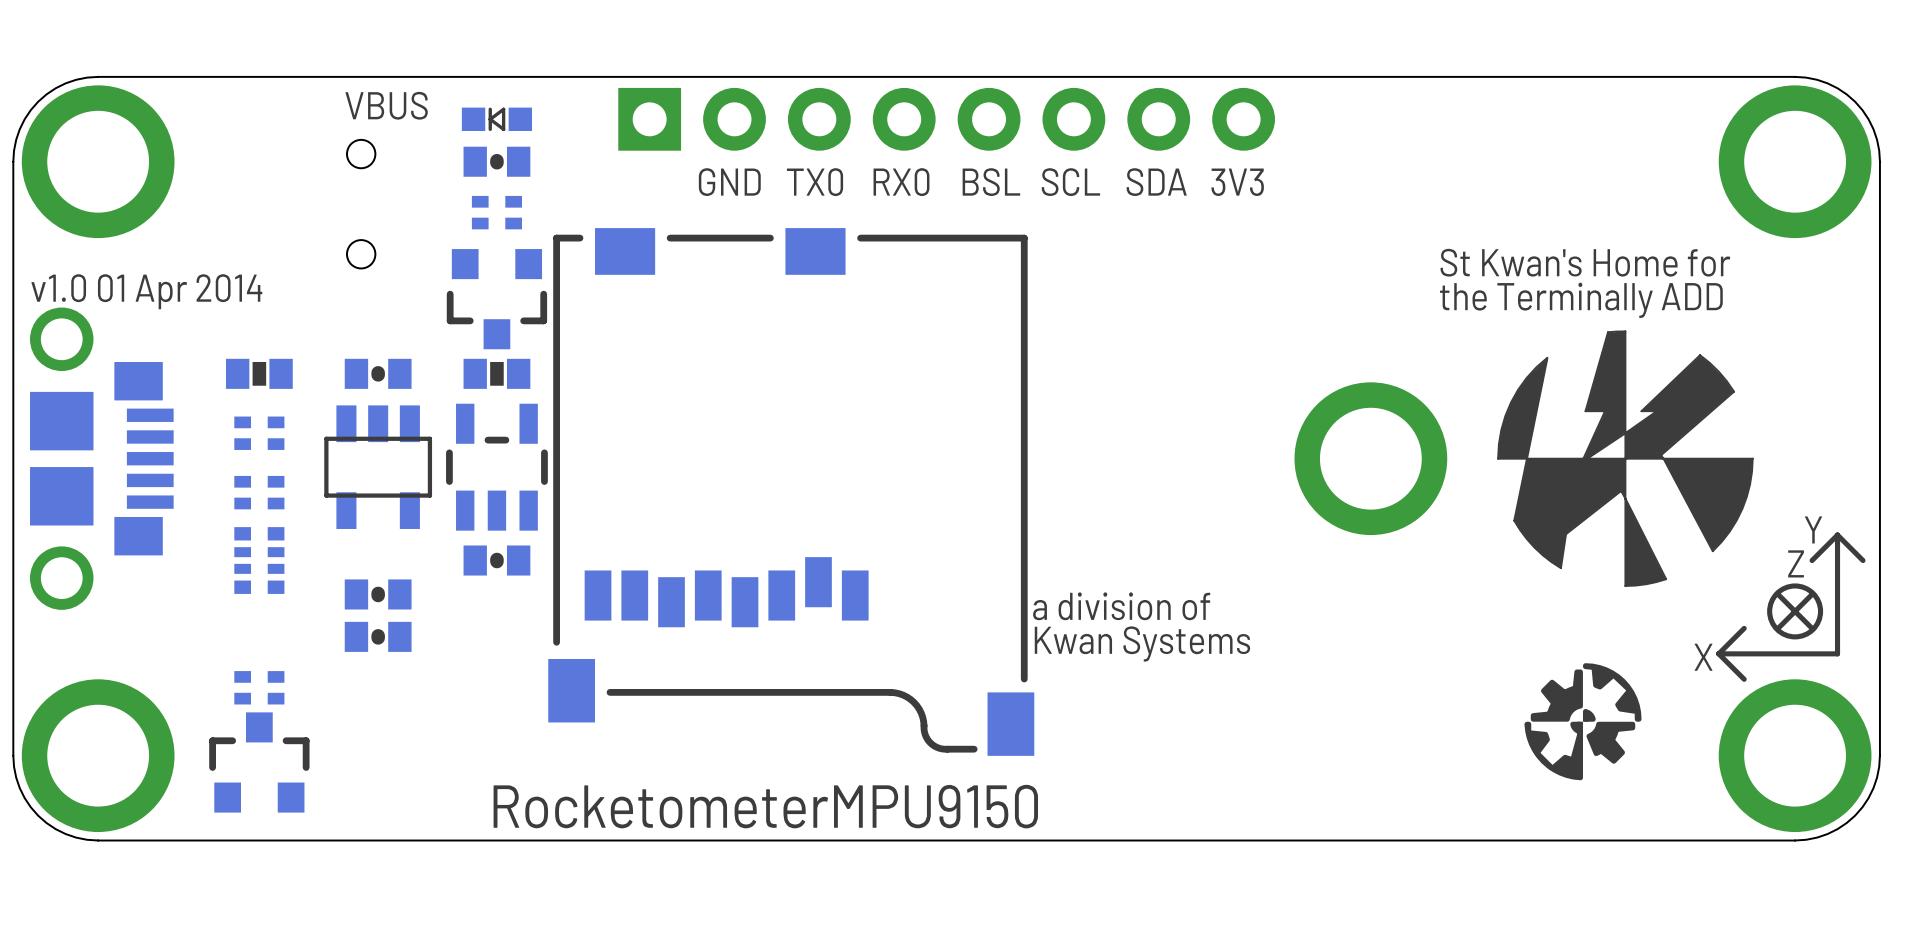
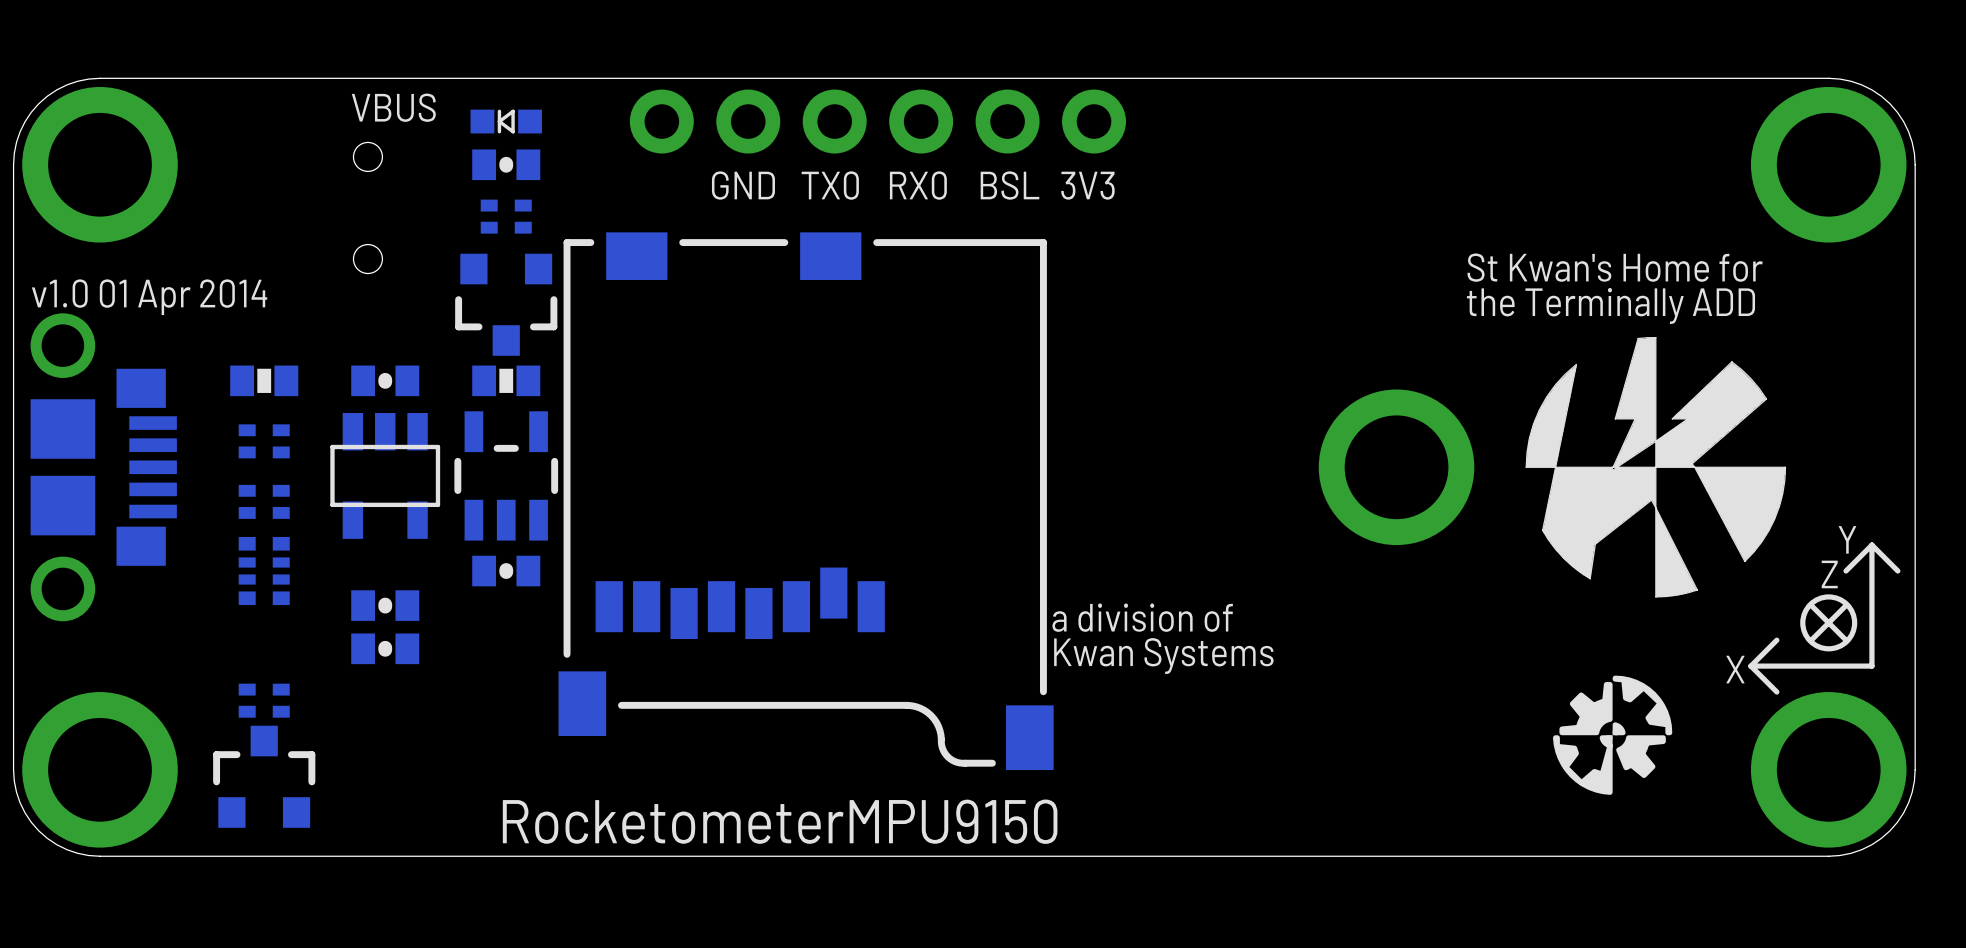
part: none -> (877, 121)
part: (946, 119) -> none
text: SCL (1070, 182) -> 3V3 (1087, 185)
text: SDA (1156, 182) -> none
text: 3V3 (1237, 182) -> none

